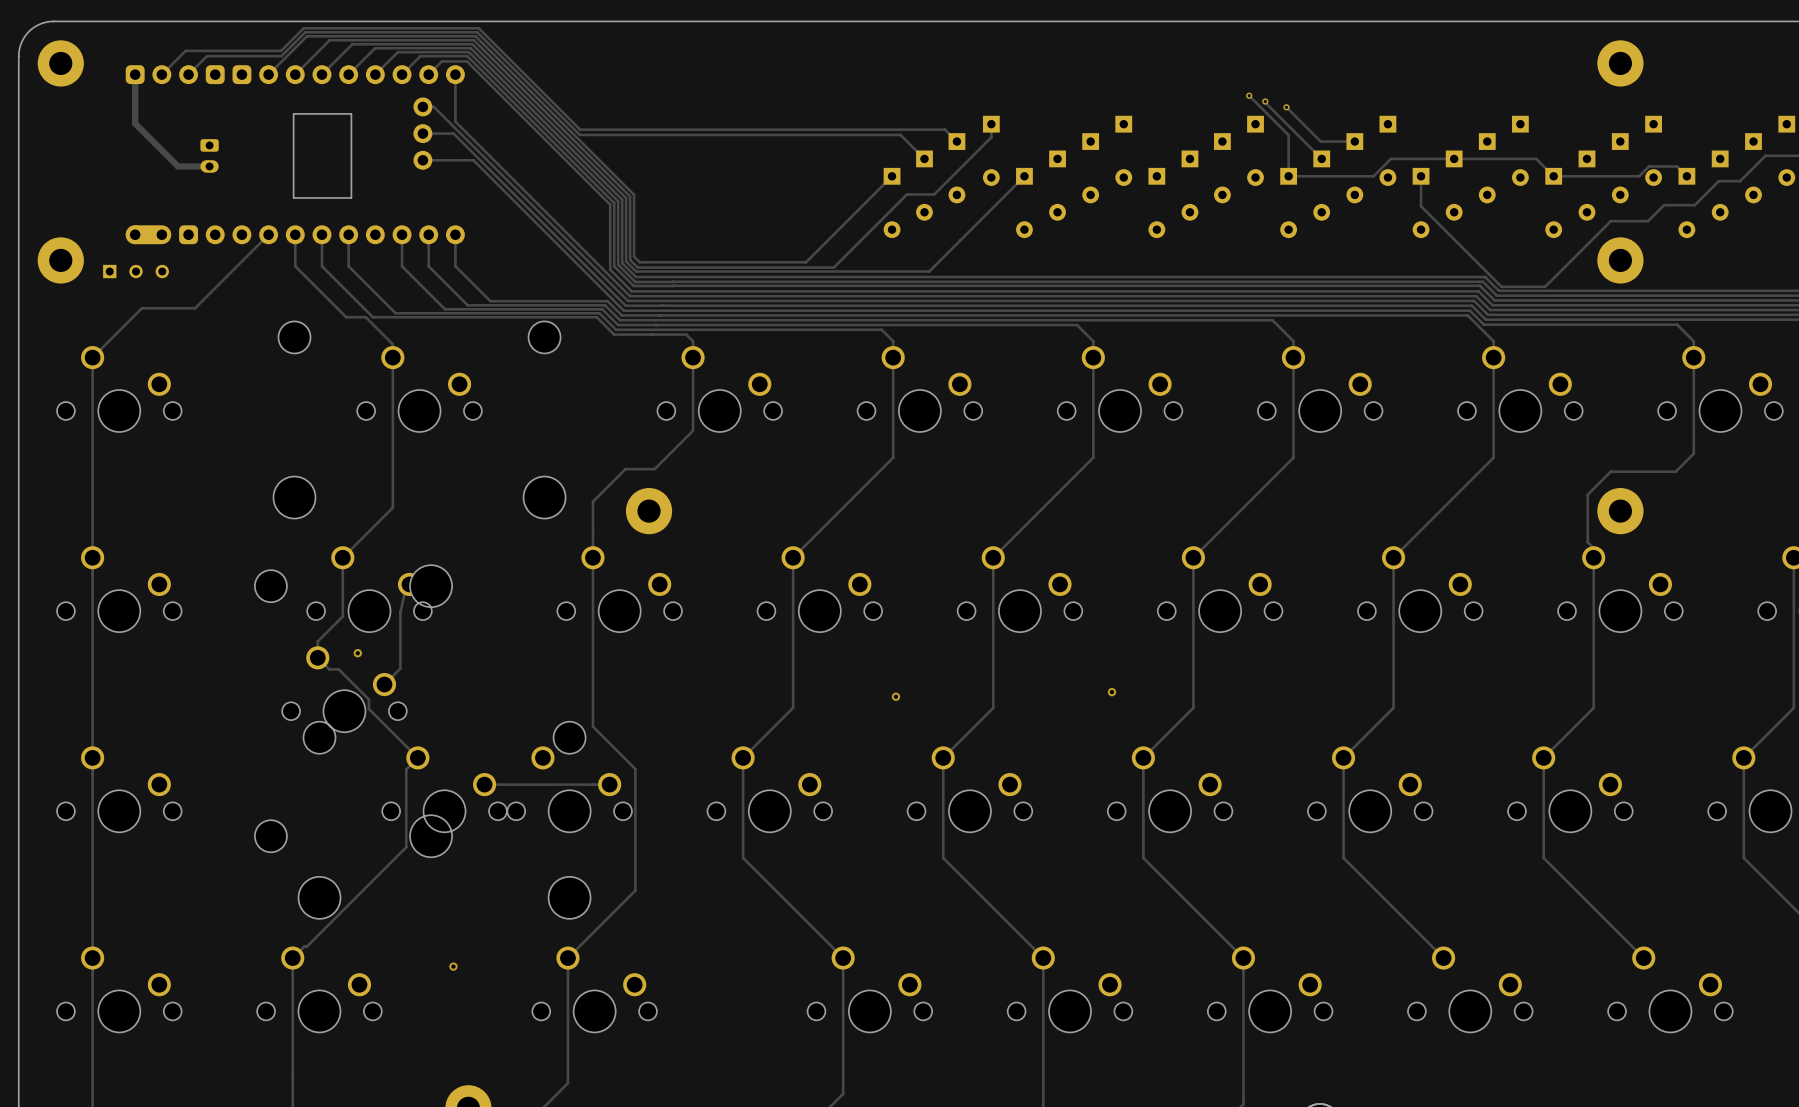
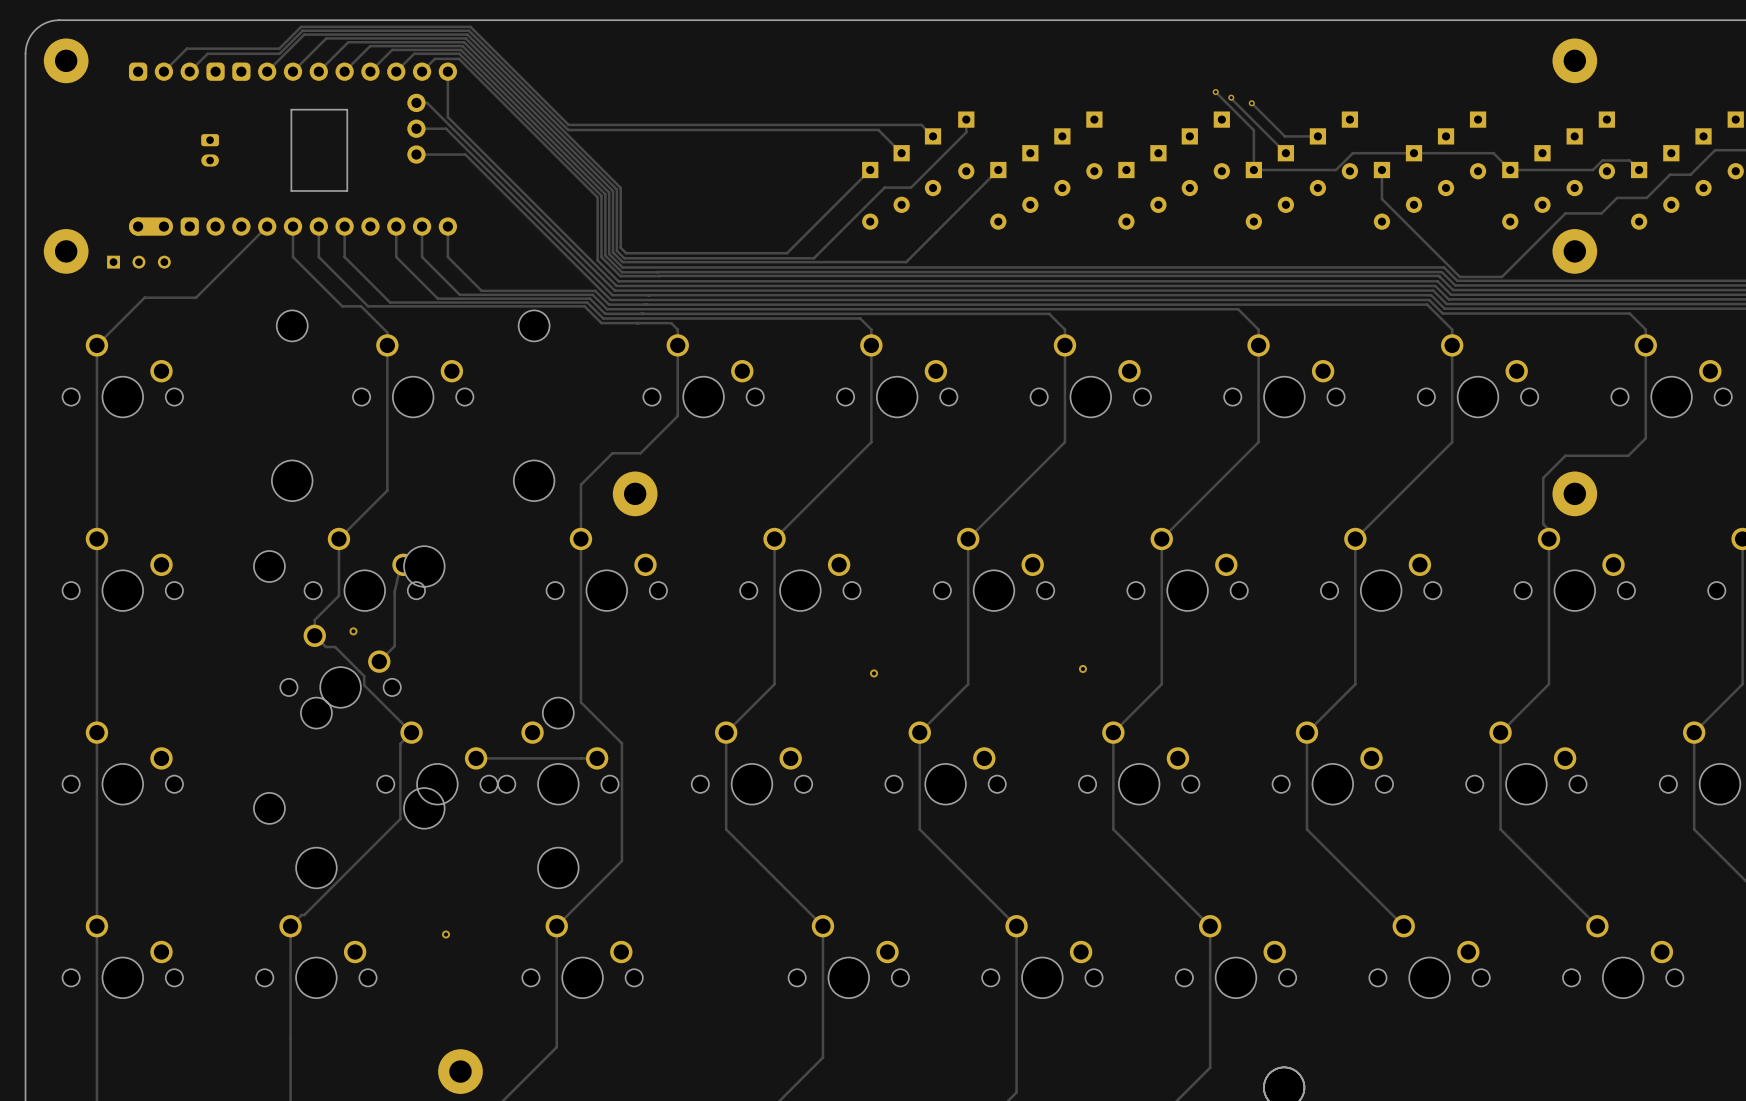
track: (135, 74) (135, 123) (178, 166) (209, 166) -> none

